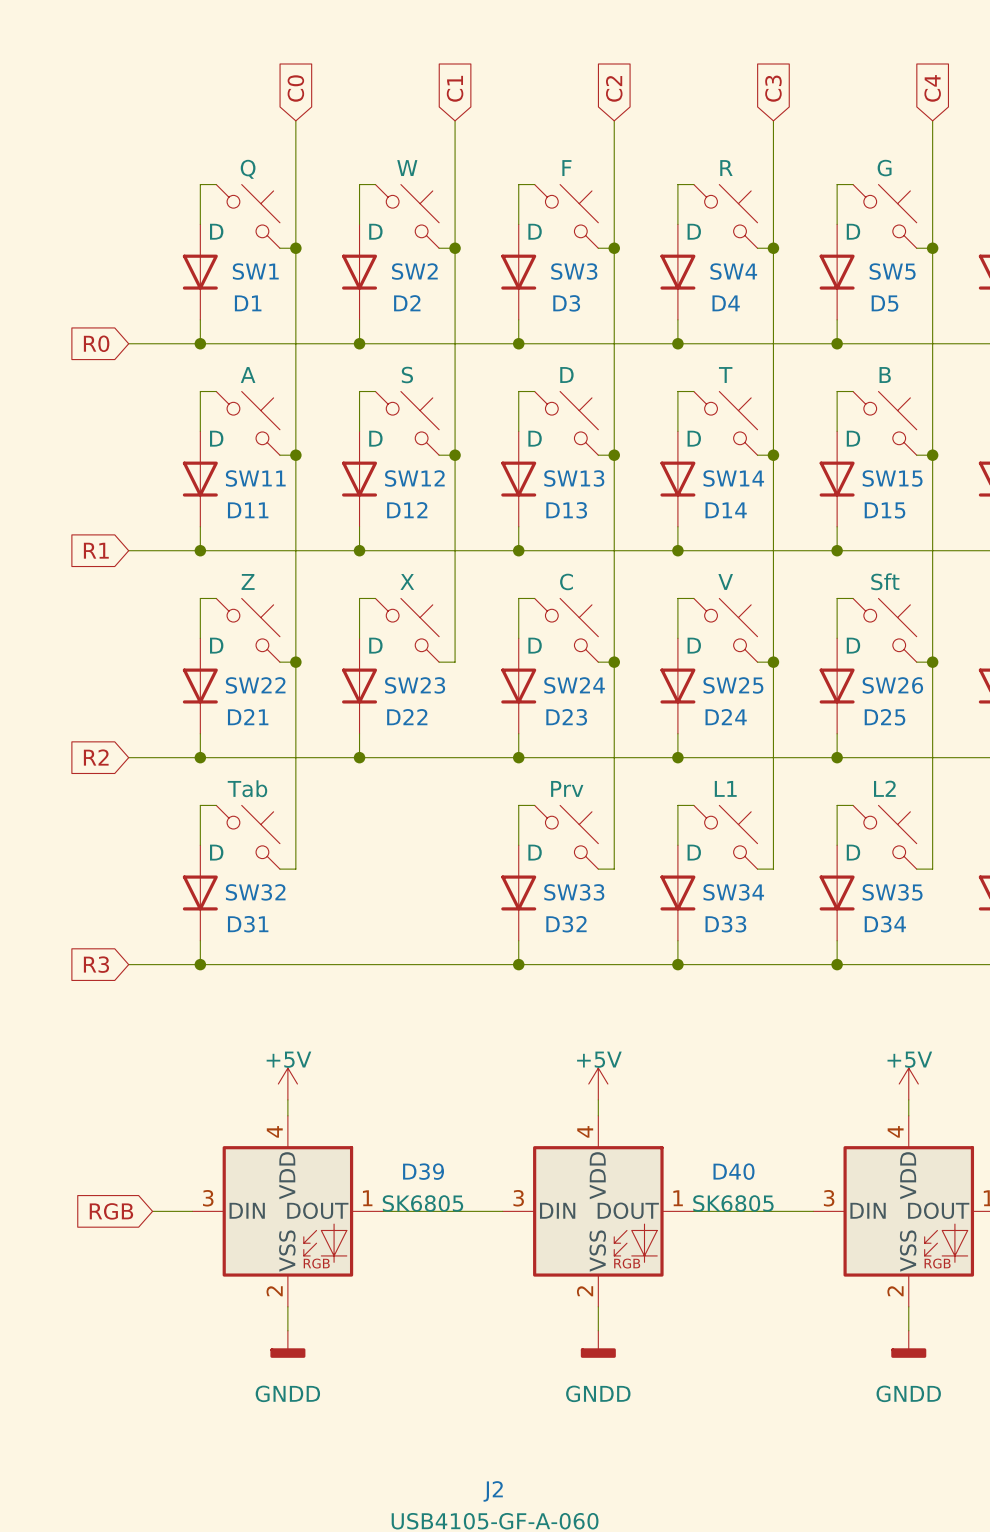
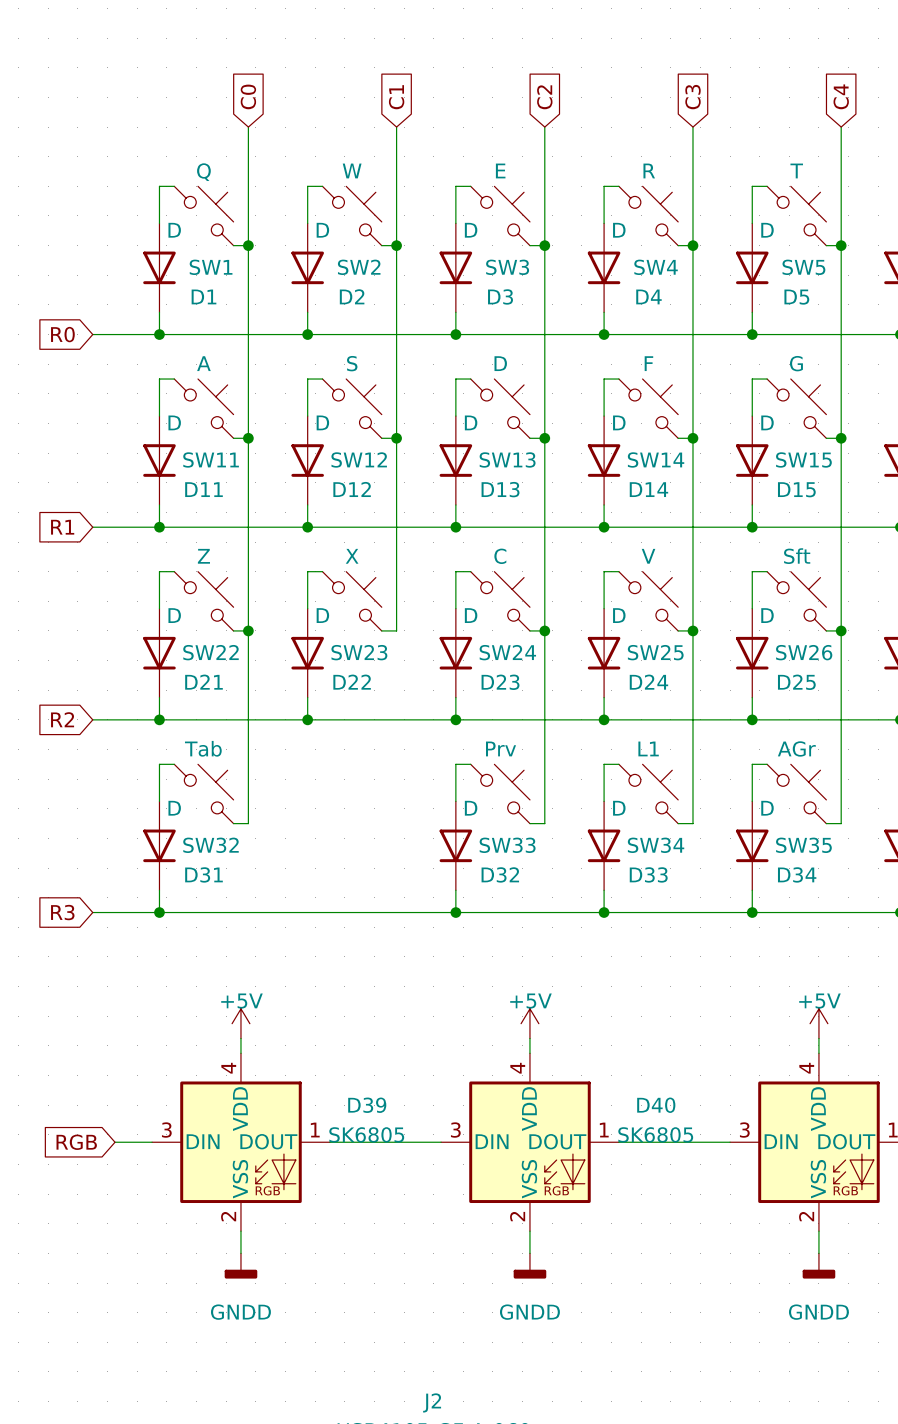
SW3 value: F (566, 168) -> E (500, 170)
SW5 value: G (884, 168) -> T (796, 170)
SW14 value: T (725, 375) -> F (648, 363)
SW15 value: B (885, 375) -> G (796, 363)
SW35 value: L2 (884, 788) -> AGr (796, 748)

